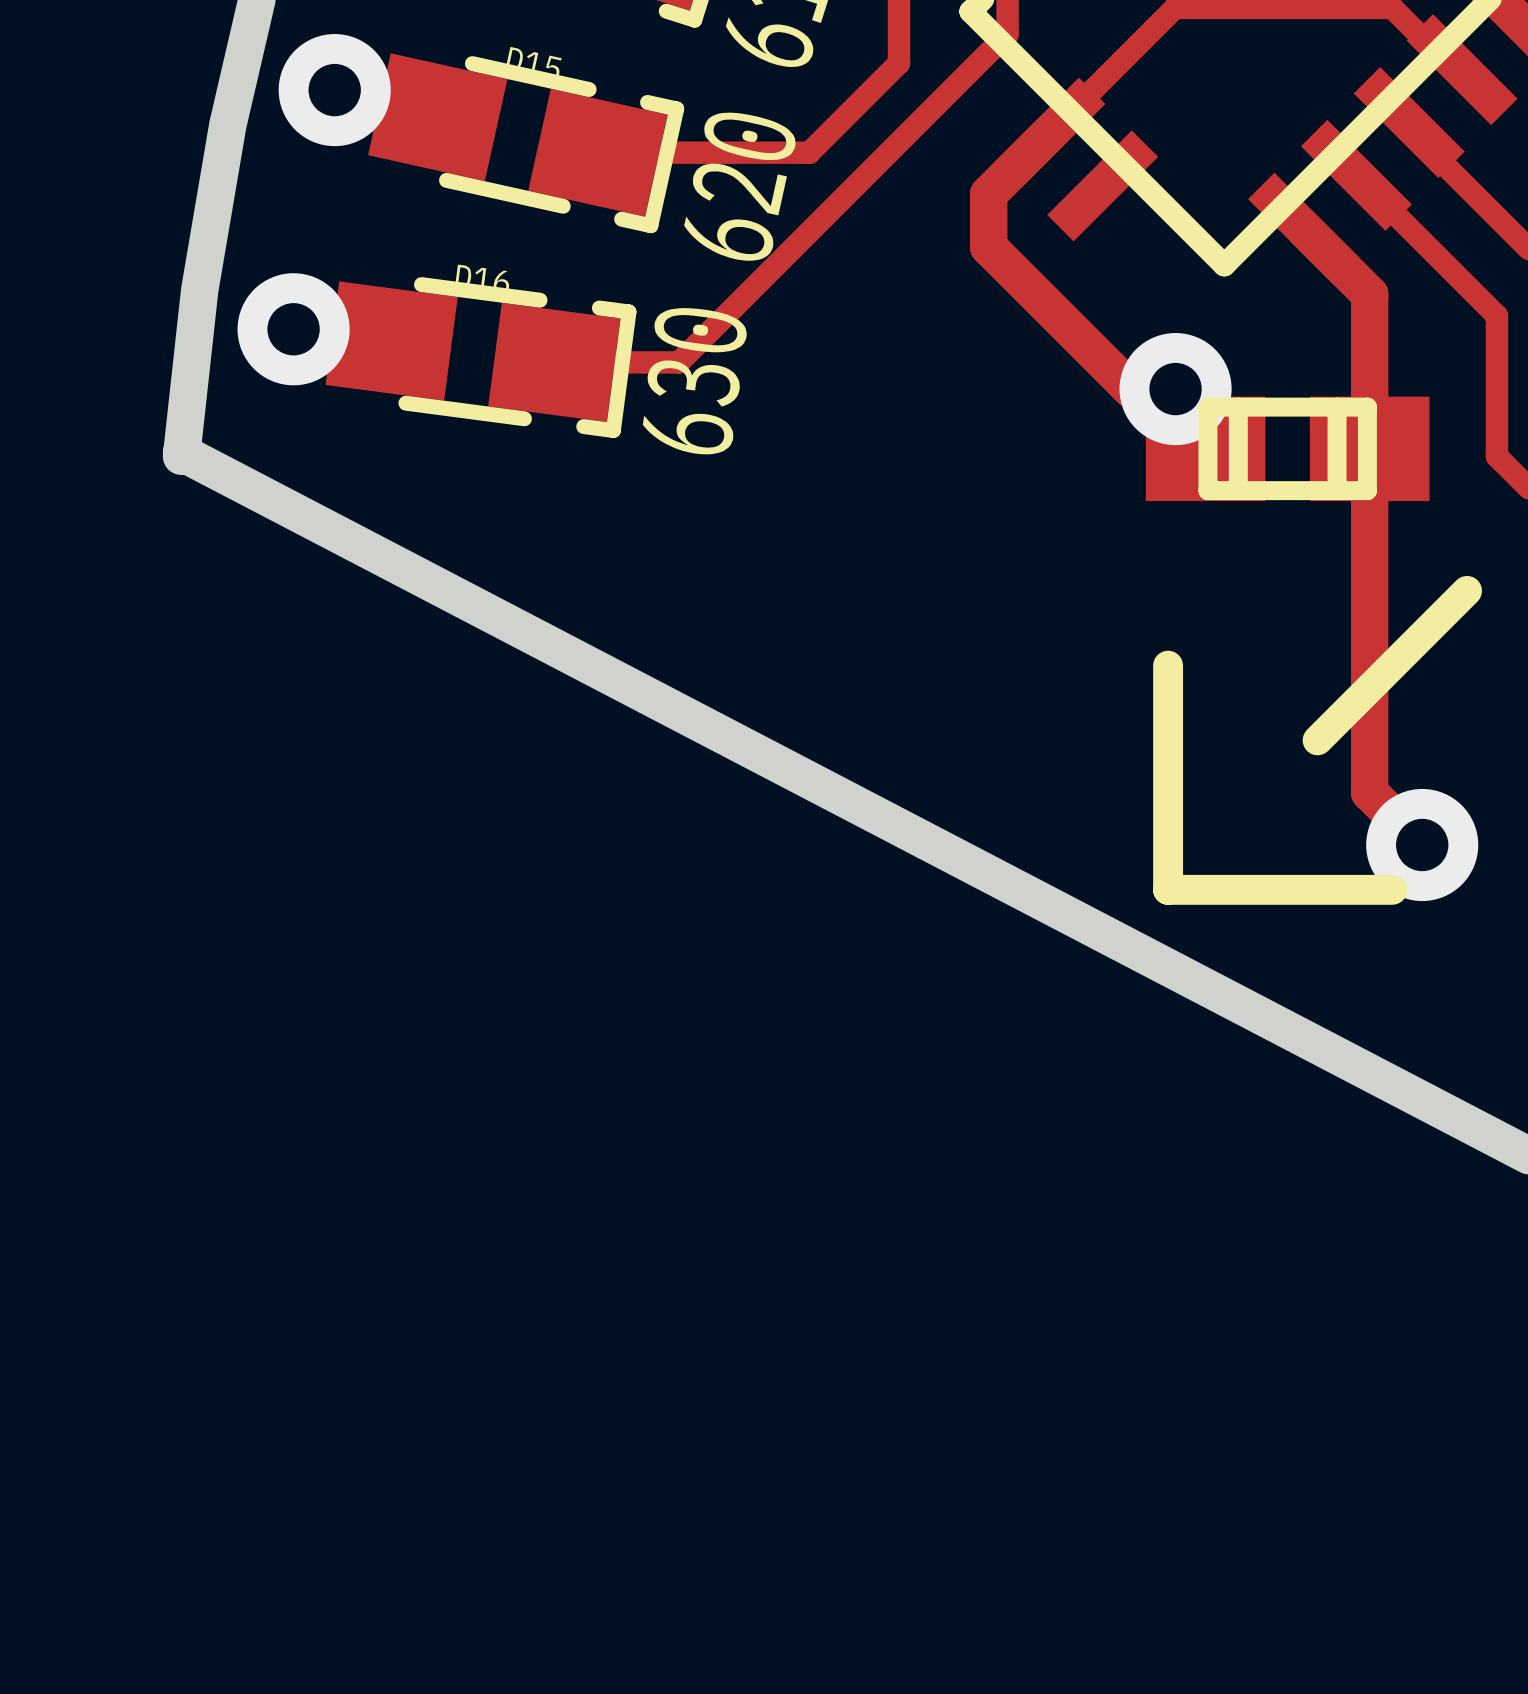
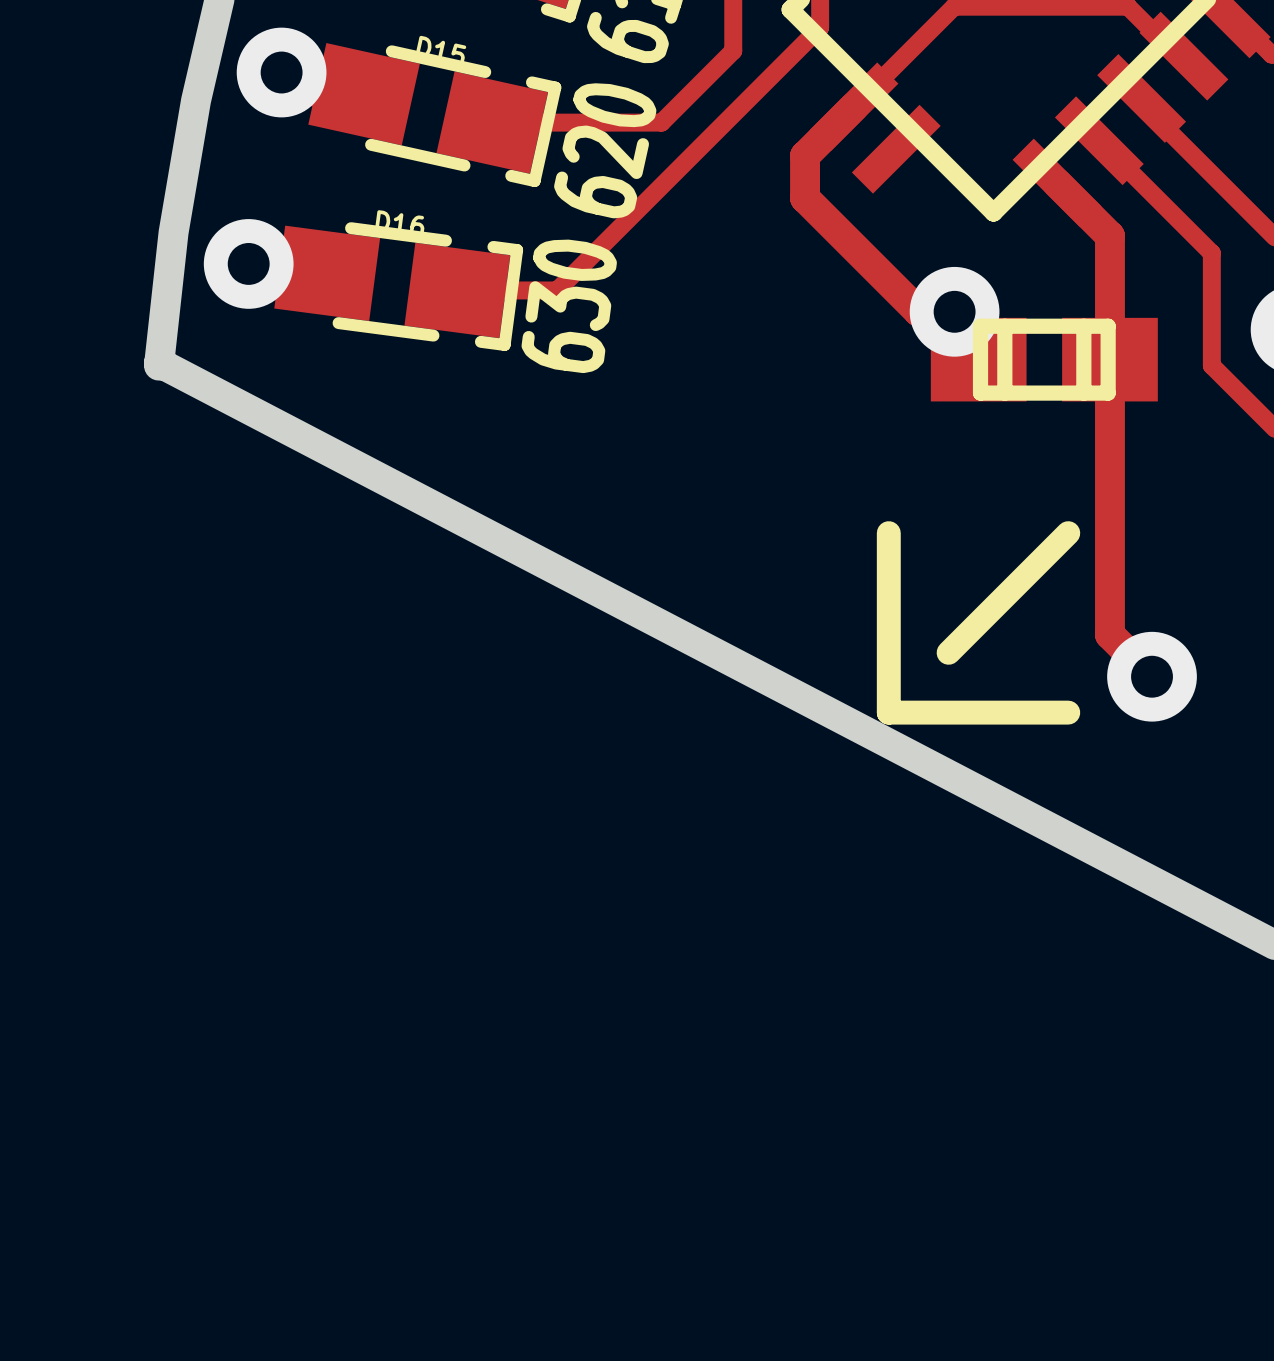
line: (1467, 590) (1317, 740) -> (1068, 533) (948, 652)
line: (1168, 665) (1168, 889) -> (888, 533) (888, 712) (948, 712)
line: (1317, 889) (1392, 889) -> none

